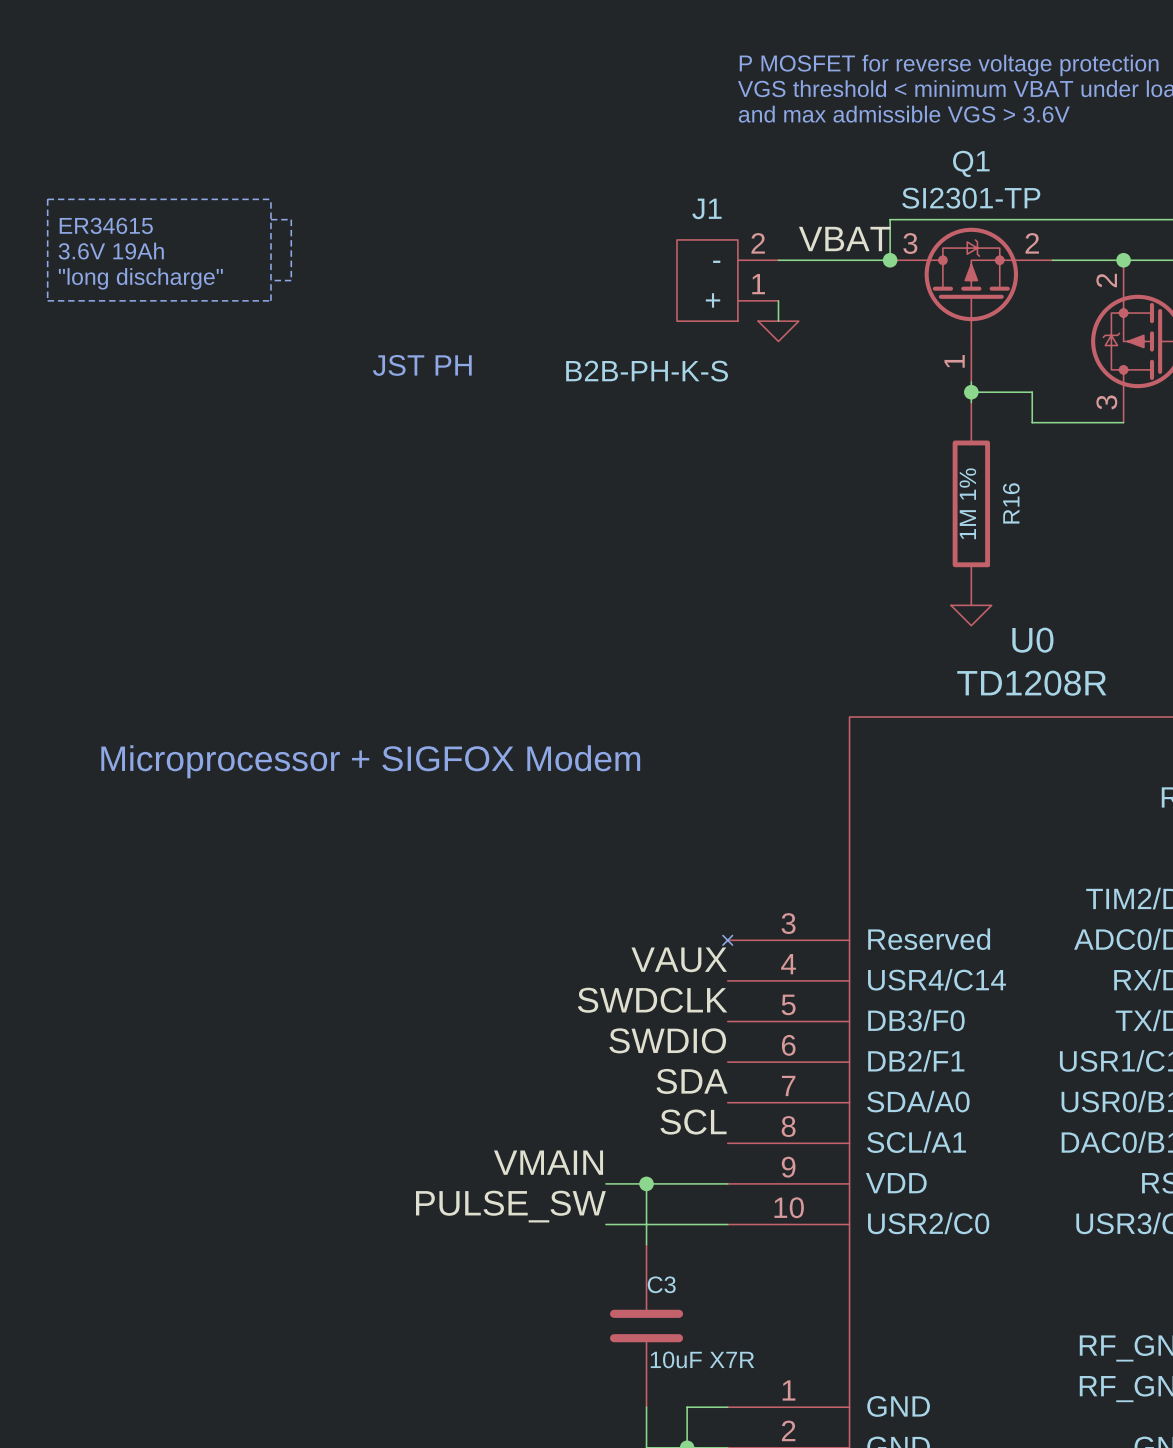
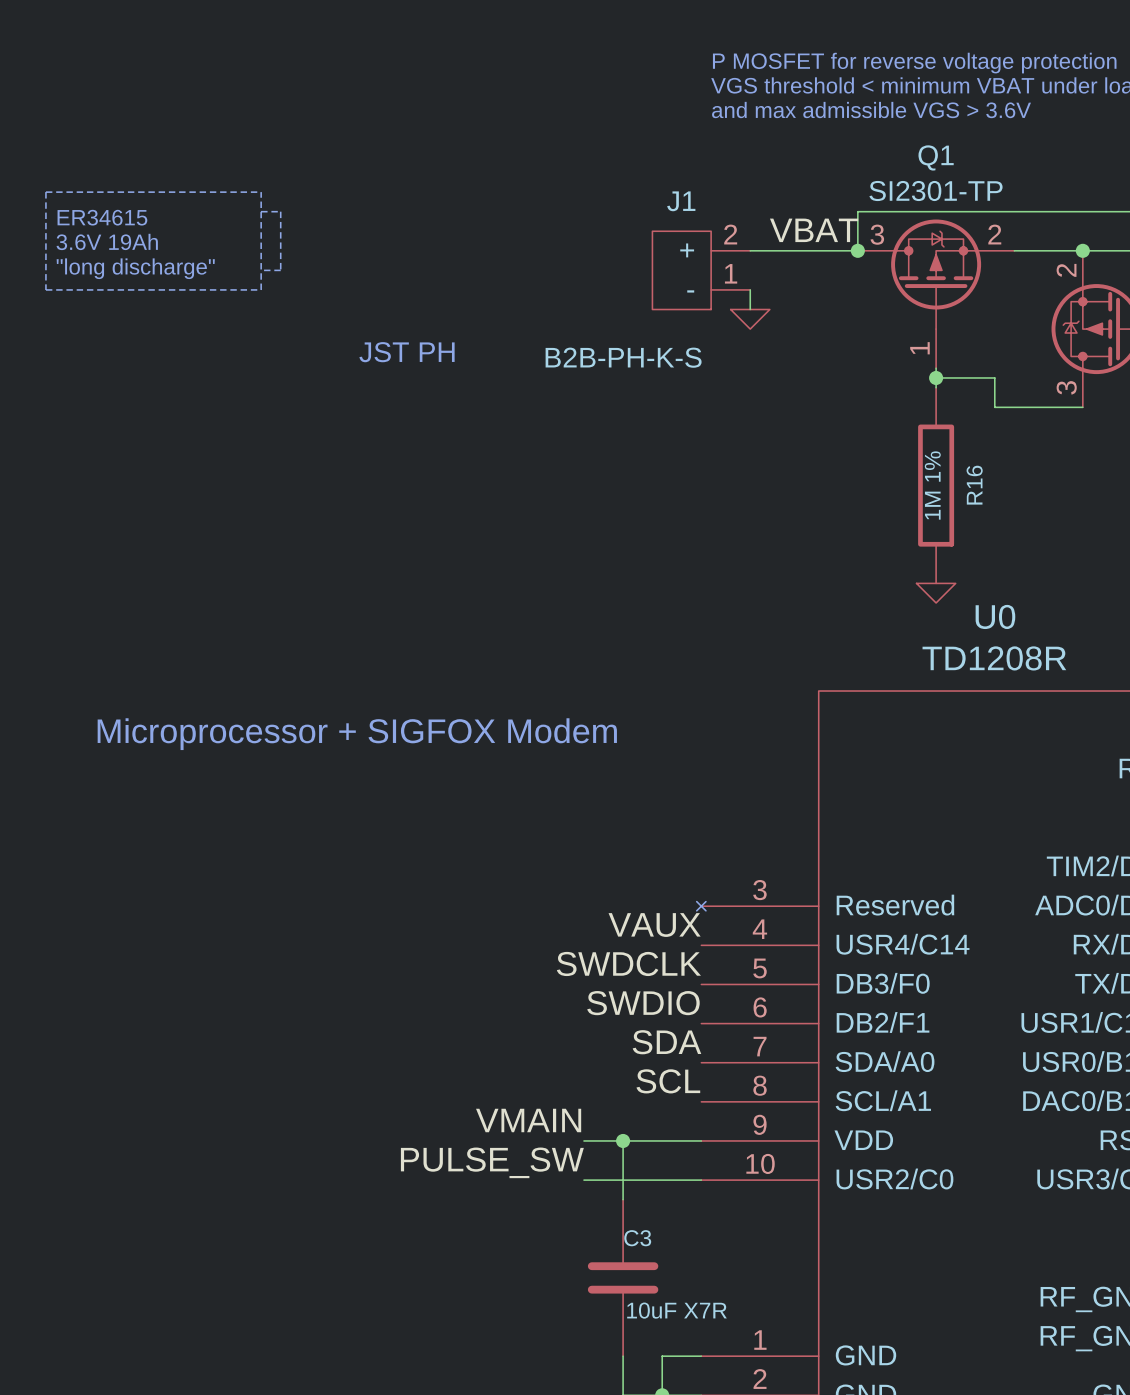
J1 pin name: - (716, 261) -> + (687, 250)
J1 pin name: + (713, 300) -> - (690, 291)

